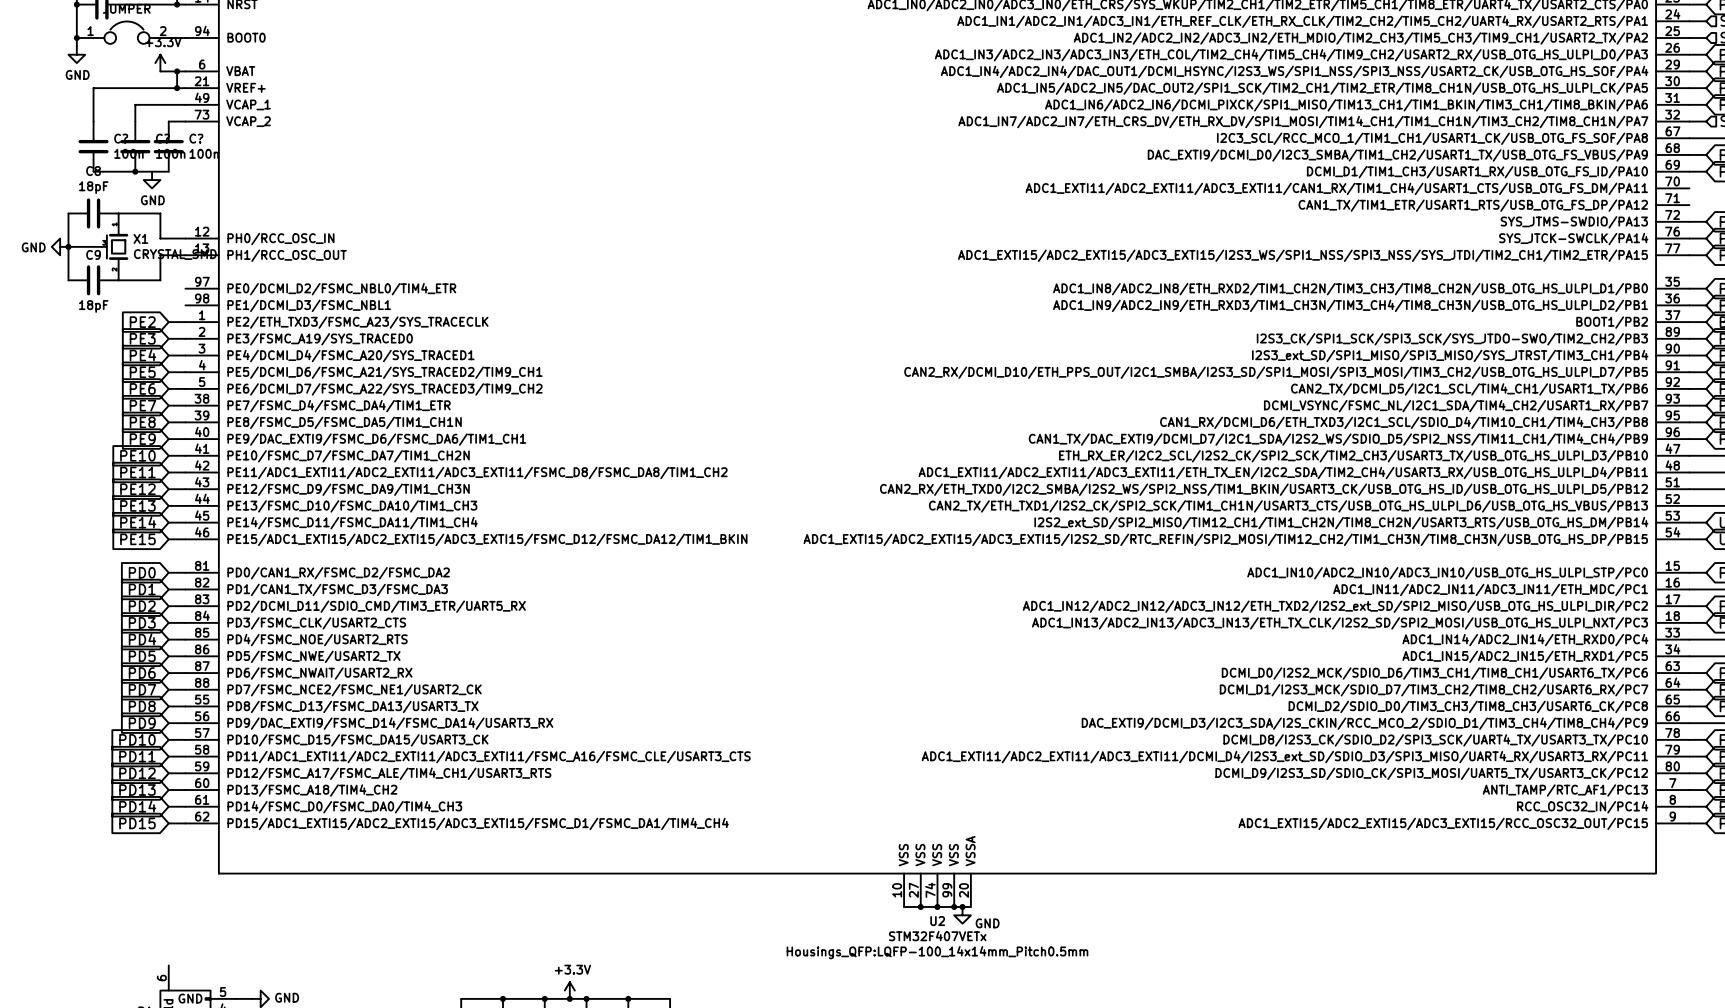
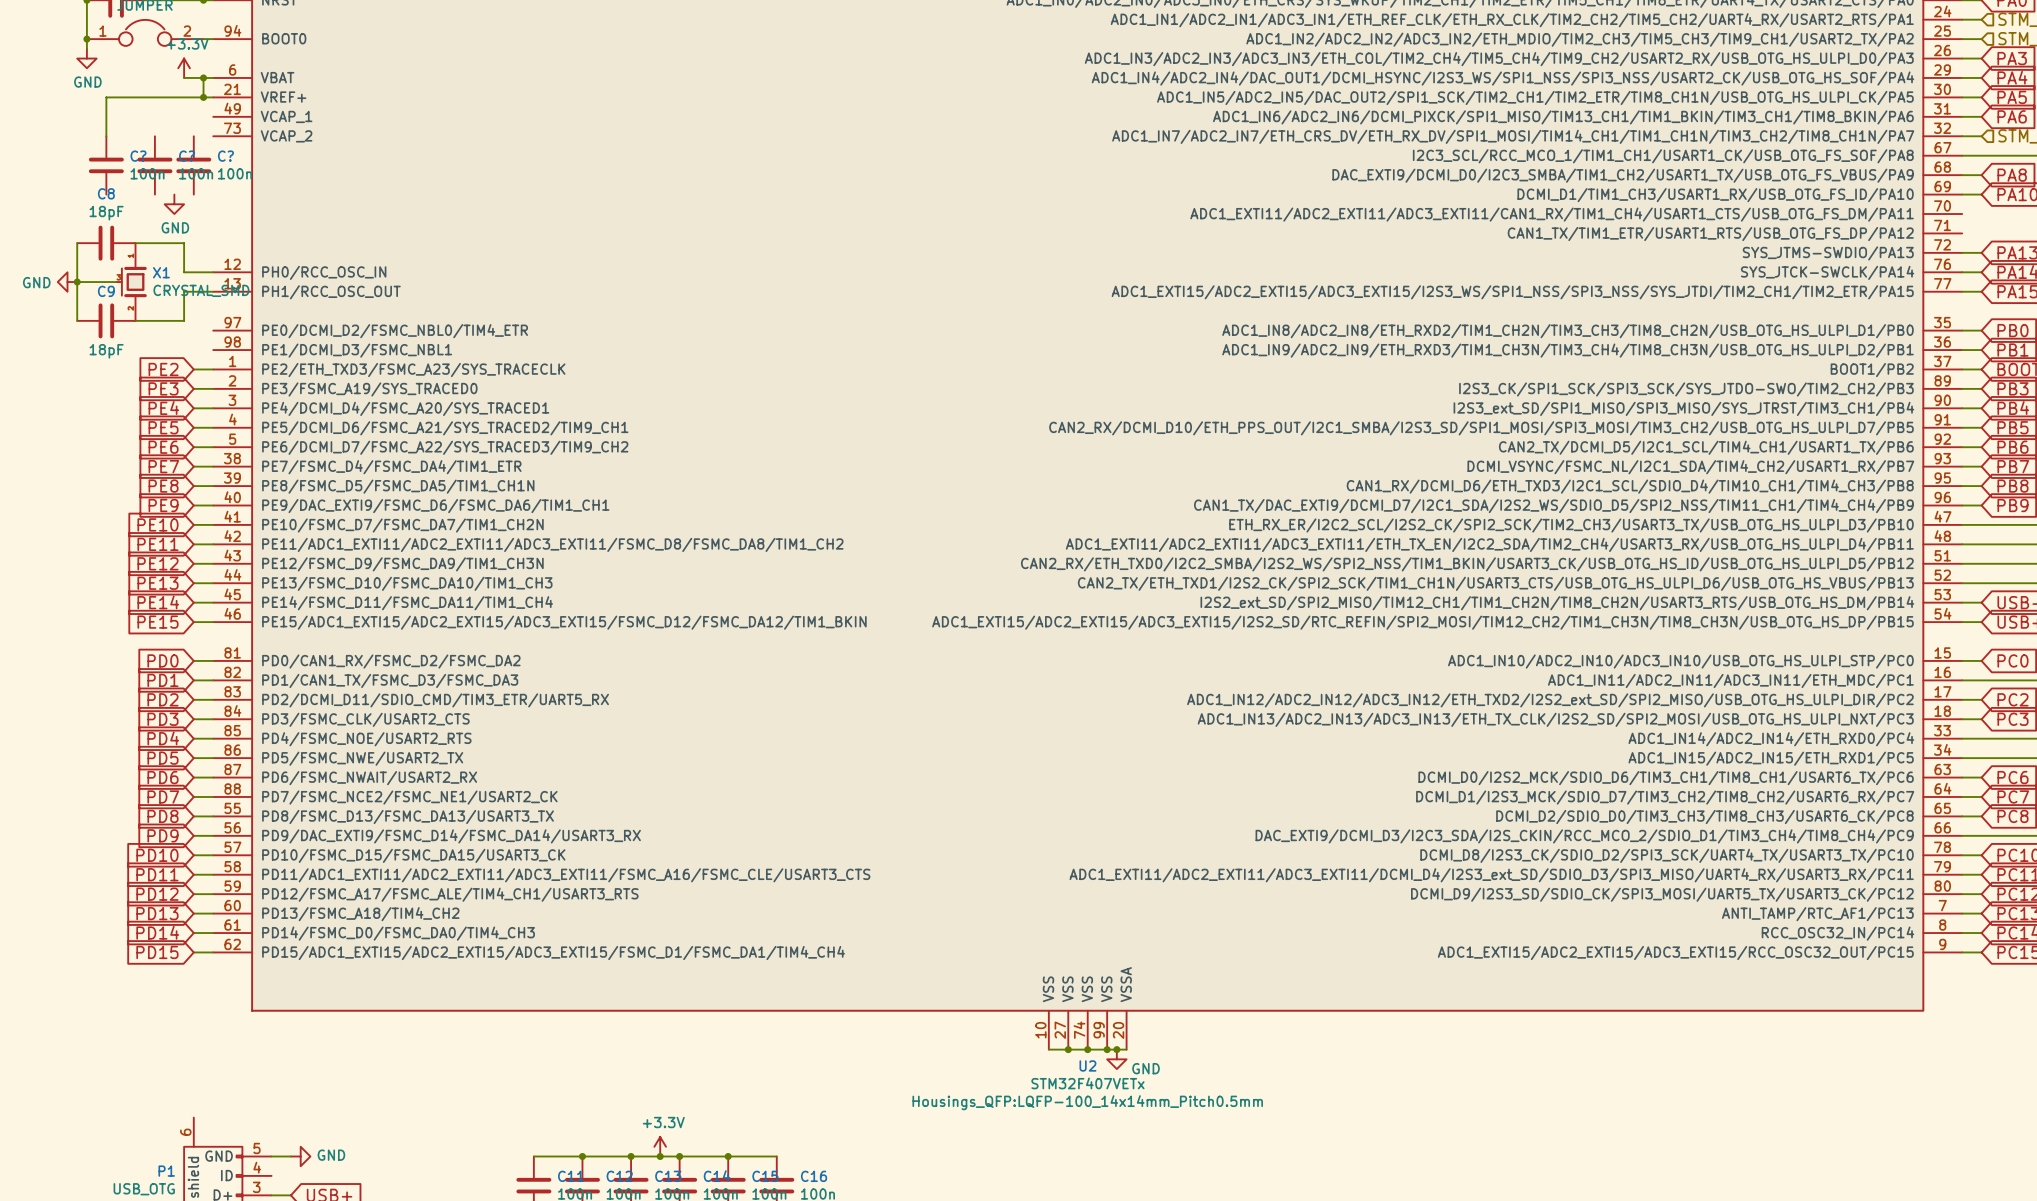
wire: (185, 104) (135, 104) (135, 121) -> none
wire: (168, 121) (185, 121) -> none
wire: (93, 171) (168, 171) -> none
junction: (135, 171) -> none

